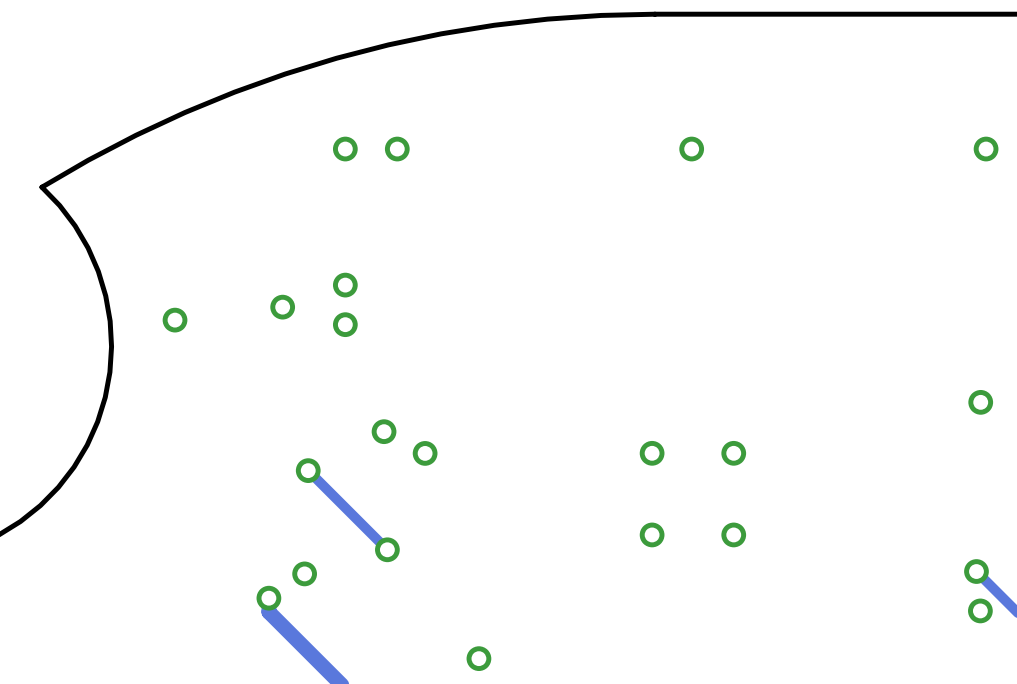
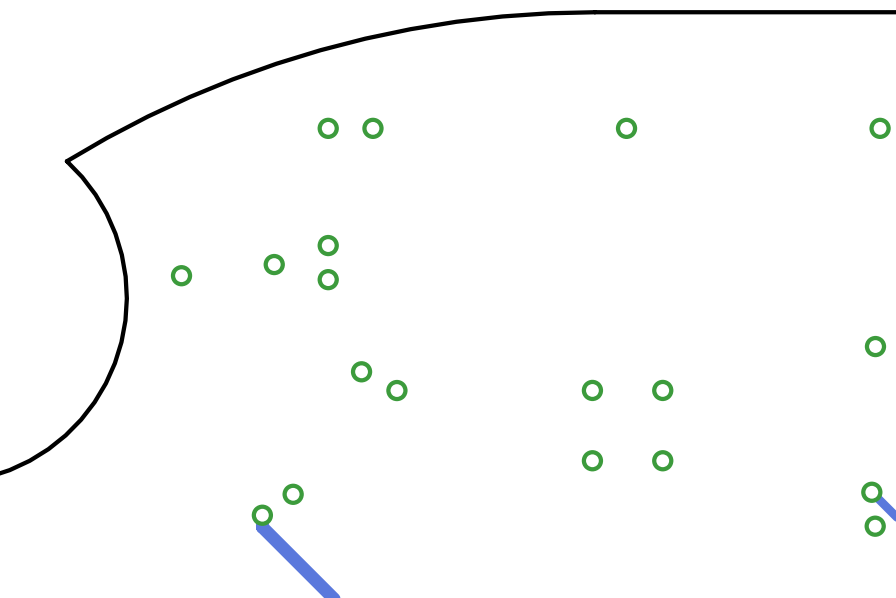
track: (308, 470) (387, 549) -> none
via: (308, 470) -> none
via: (387, 549) -> none
via: (478, 658) -> none

